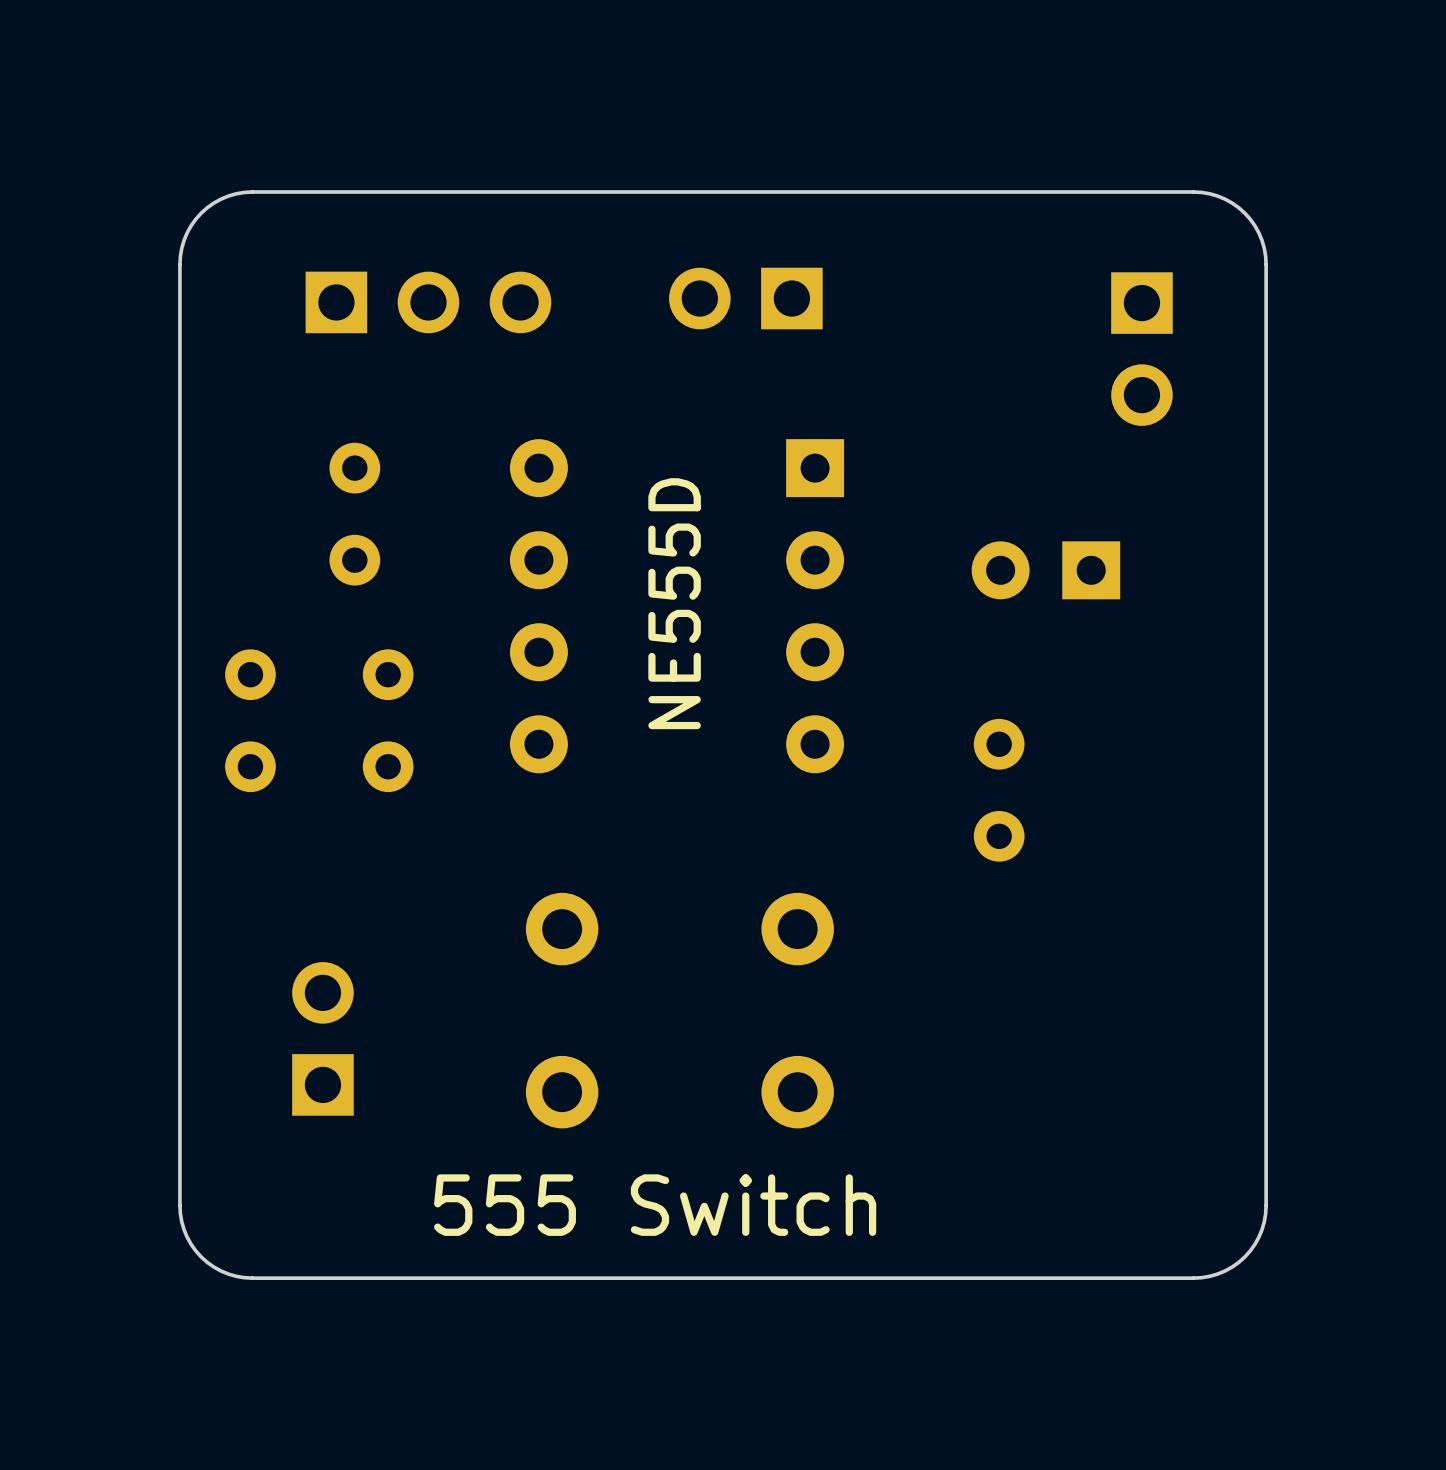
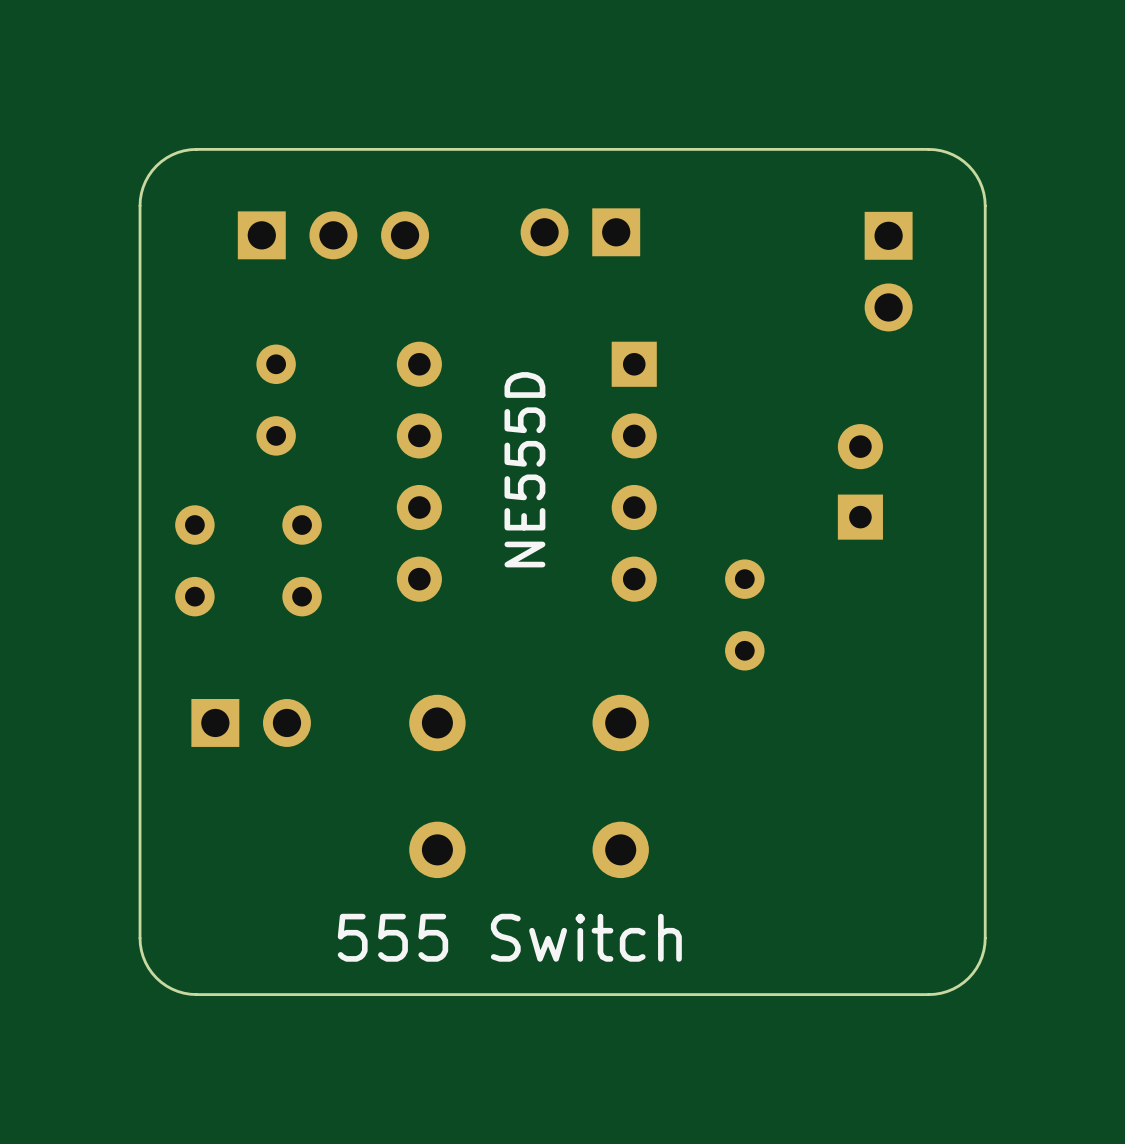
part rotation: 0° (1045, 570) -> 90° clockwise (860, 481)
part position: (999, 790) -> (744, 614)
part rotation: 0° (322, 1038) -> 90° clockwise (251, 722)
part position: (322, 1038) -> (251, 722)

